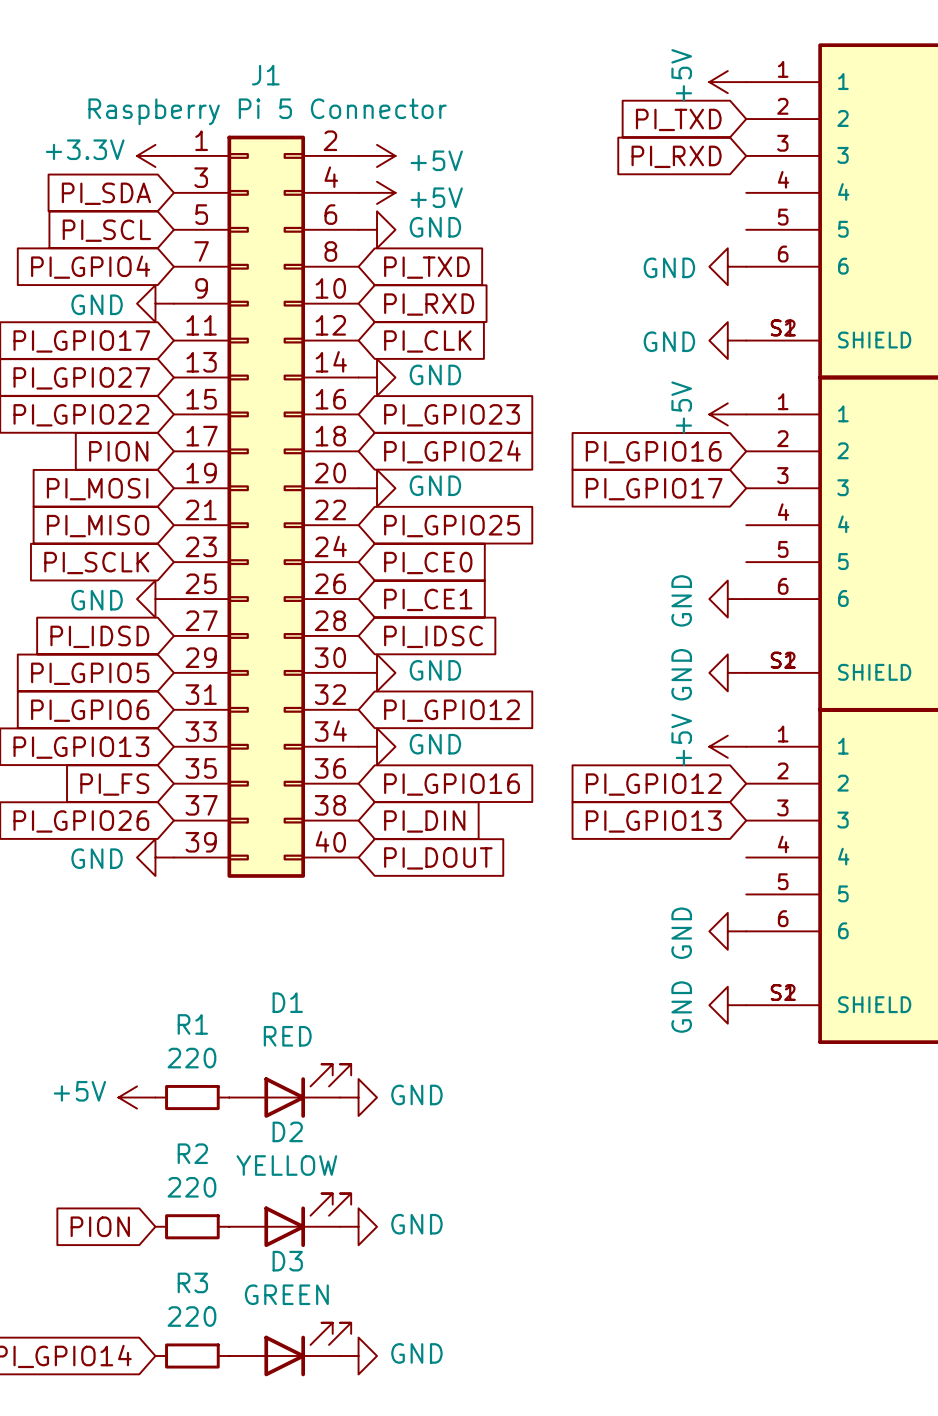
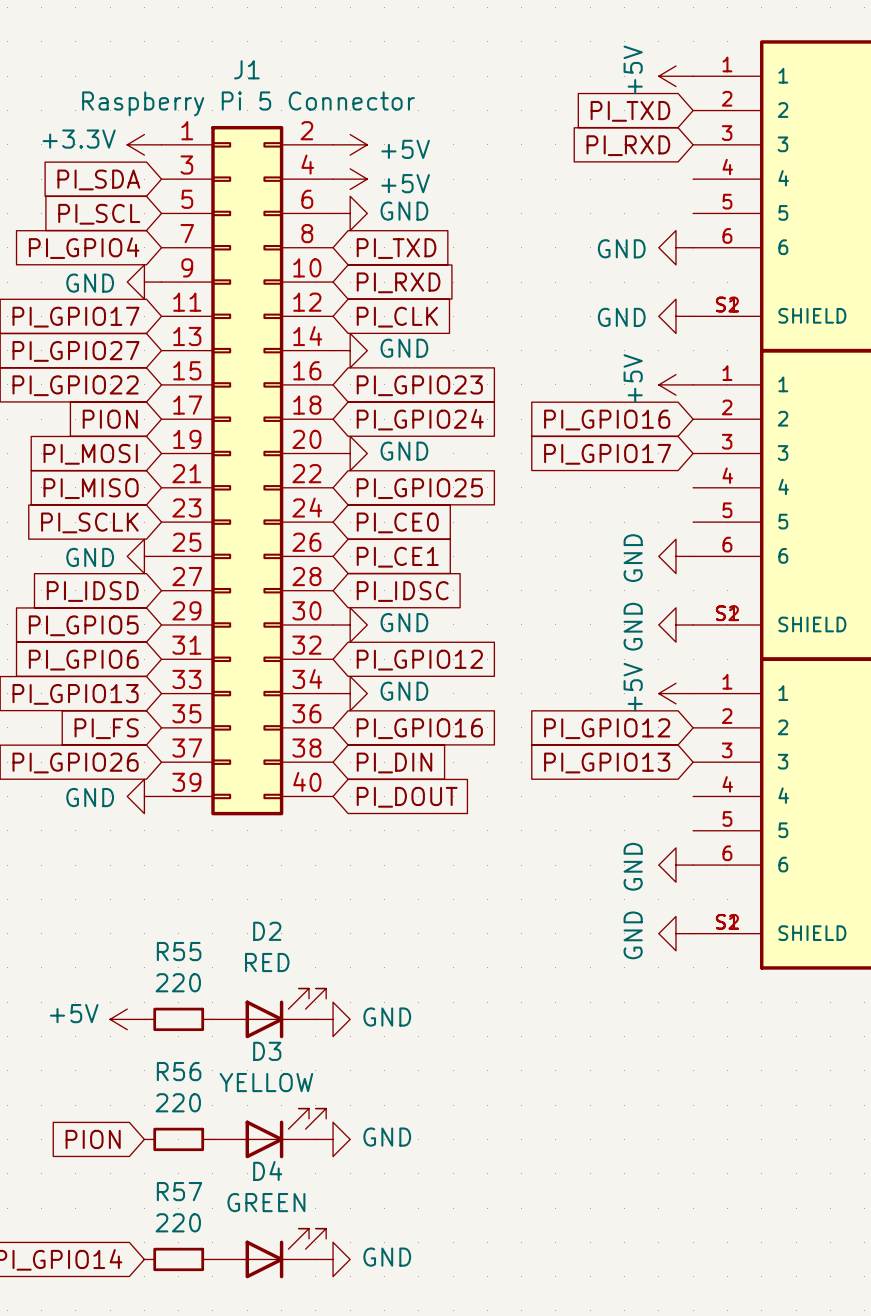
D1 name: D1 (287, 1002) -> D2 (267, 931)
R1 name: R1 (192, 1024) -> R55 (179, 951)
D2 name: D2 (287, 1131) -> D3 (267, 1051)
R2 name: R2 (192, 1153) -> R56 (179, 1071)
D3 name: D3 (287, 1261) -> D4 (267, 1170)
R3 name: R3 (192, 1282) -> R57 (179, 1191)

